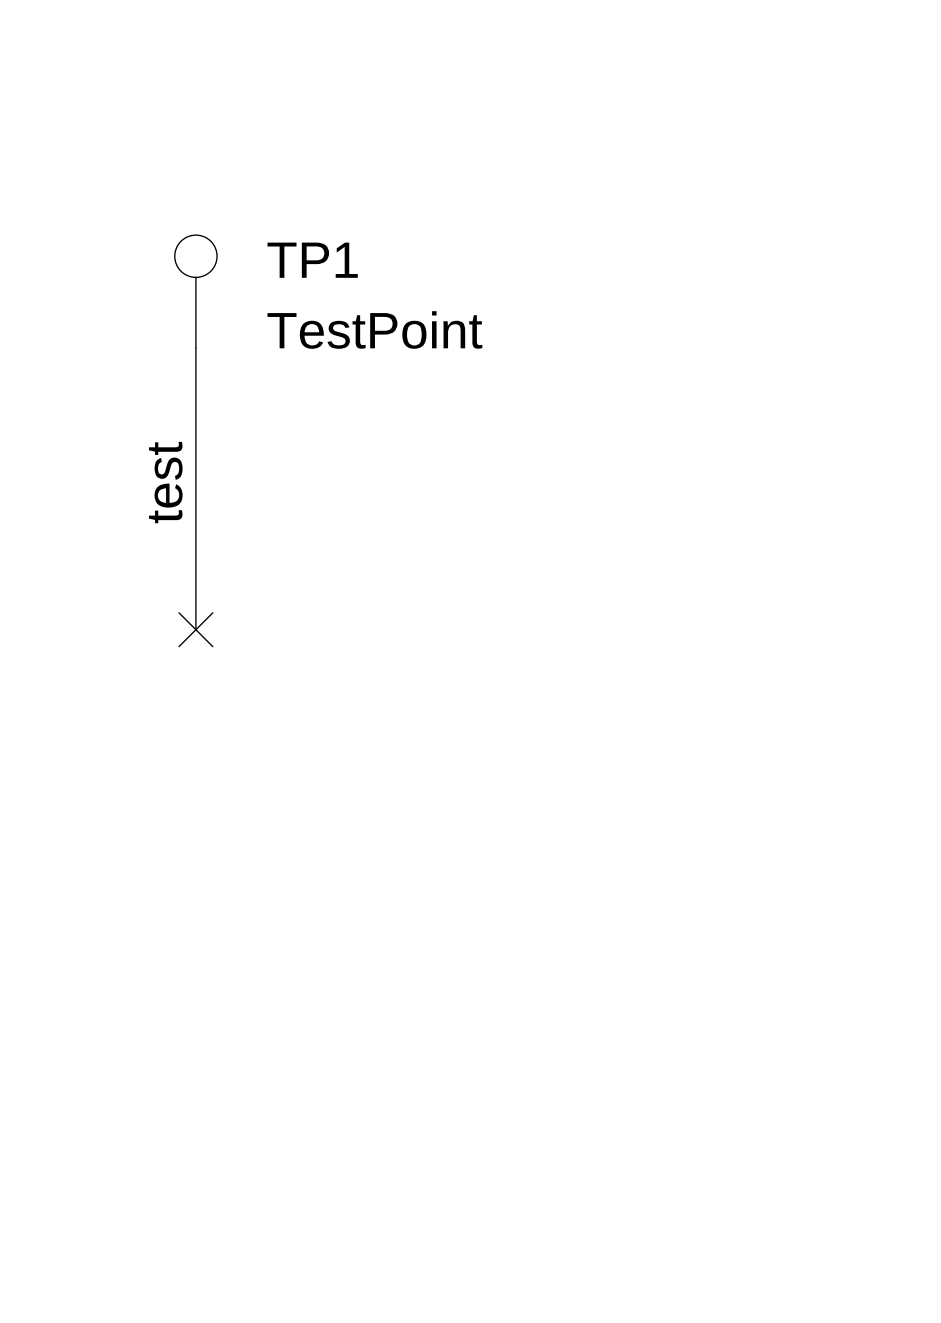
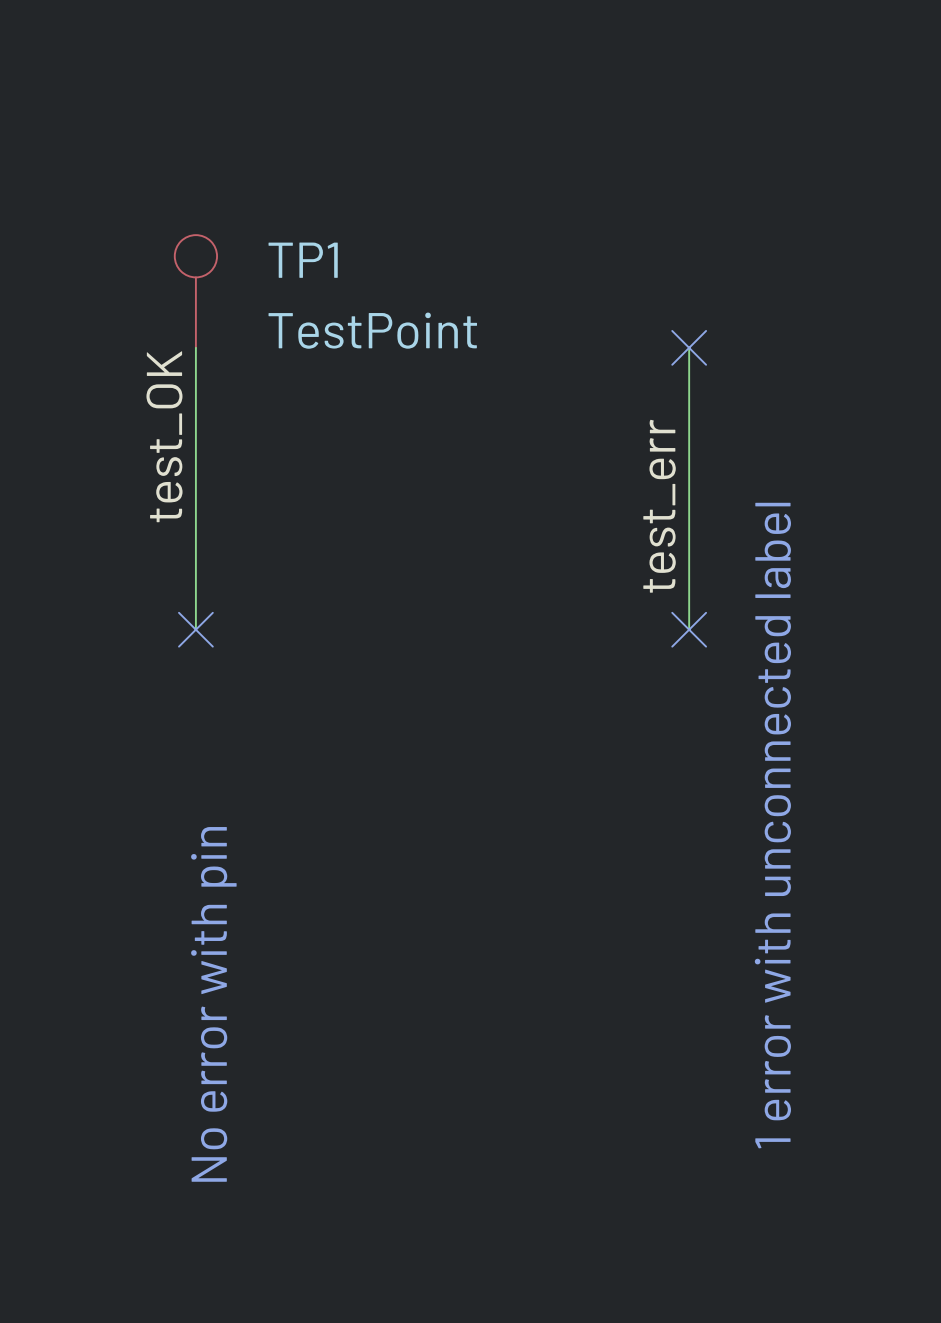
wire: none -> (689, 347) (689, 629)
no-connect mark: none -> (689, 347)
label: test (165, 482) -> test_OK (164, 436)
label: none -> test_err (659, 506)
no-connect mark: none -> (689, 629)
text: none -> 1 error with unconnected label (772, 825)
text: none -> No error with pin (213, 1004)

